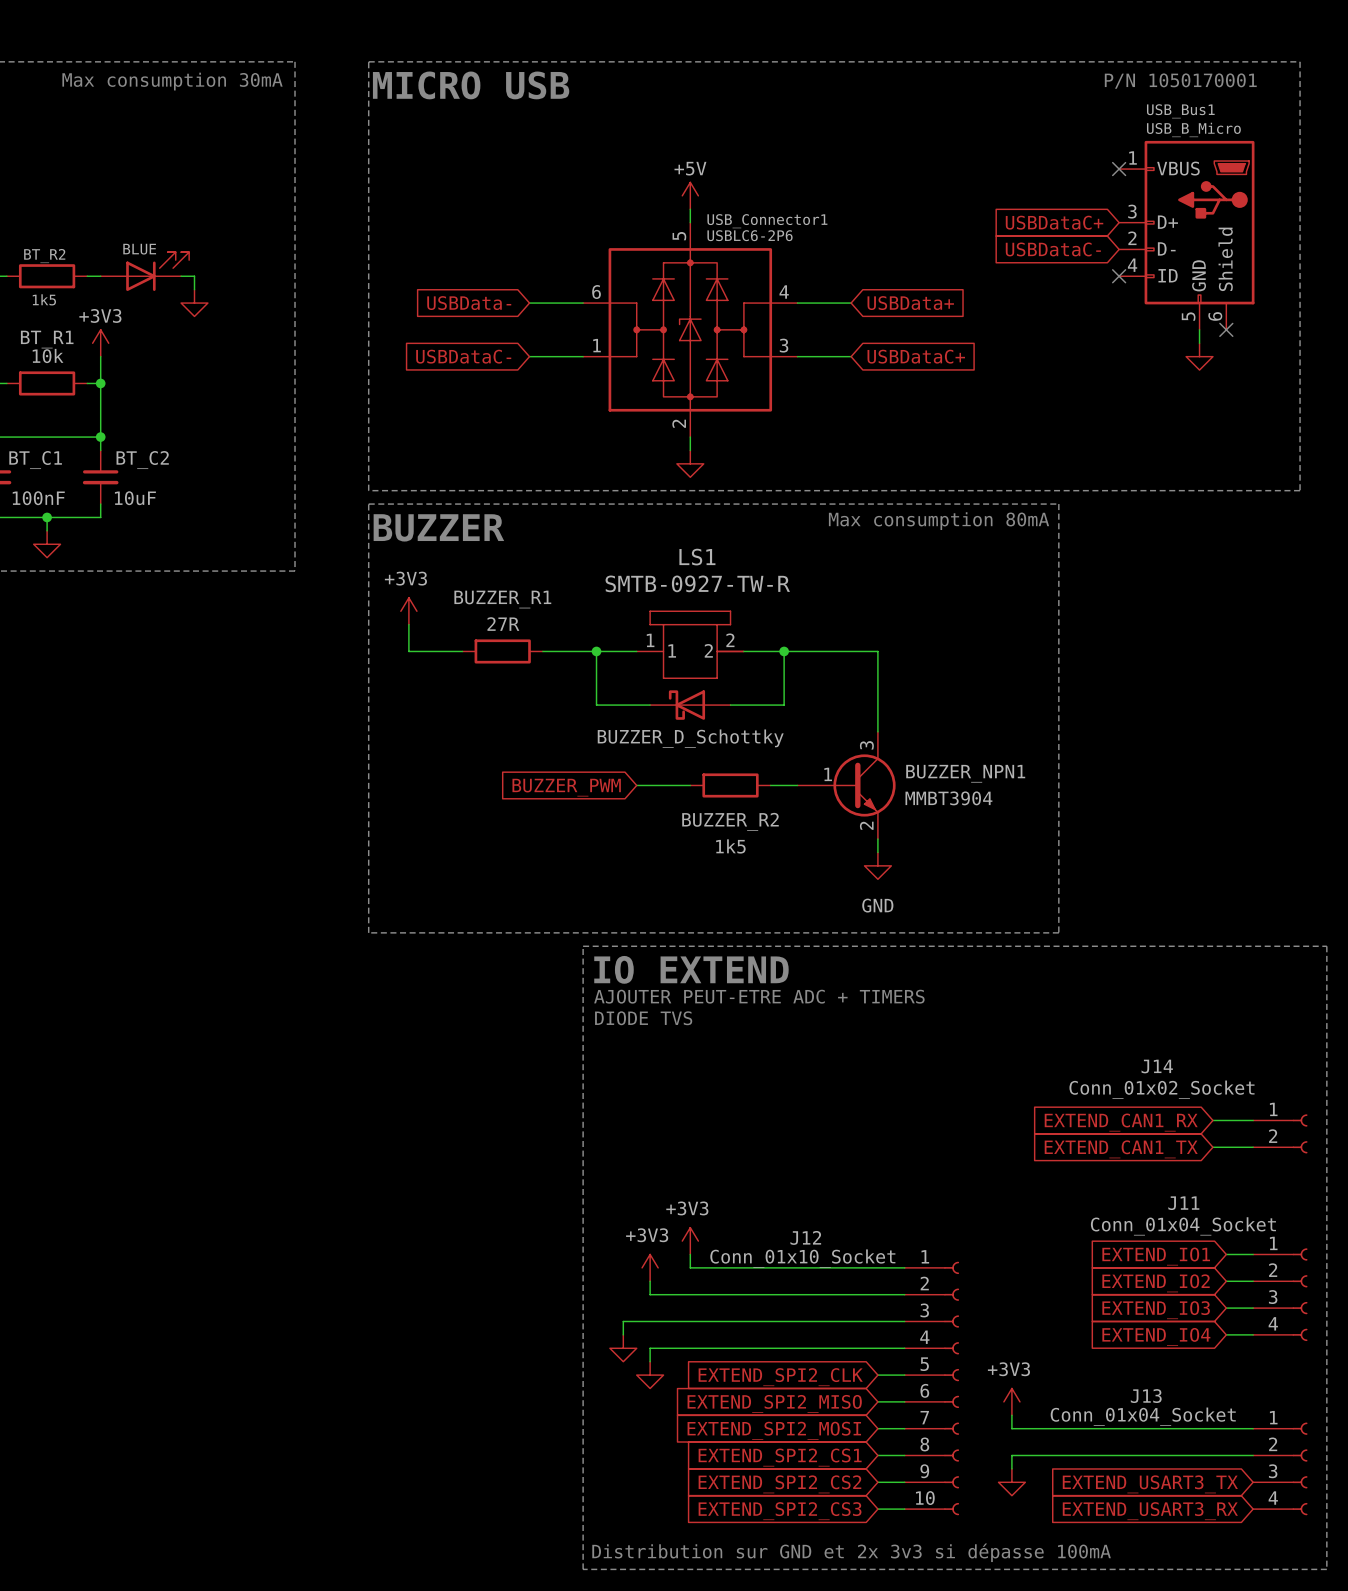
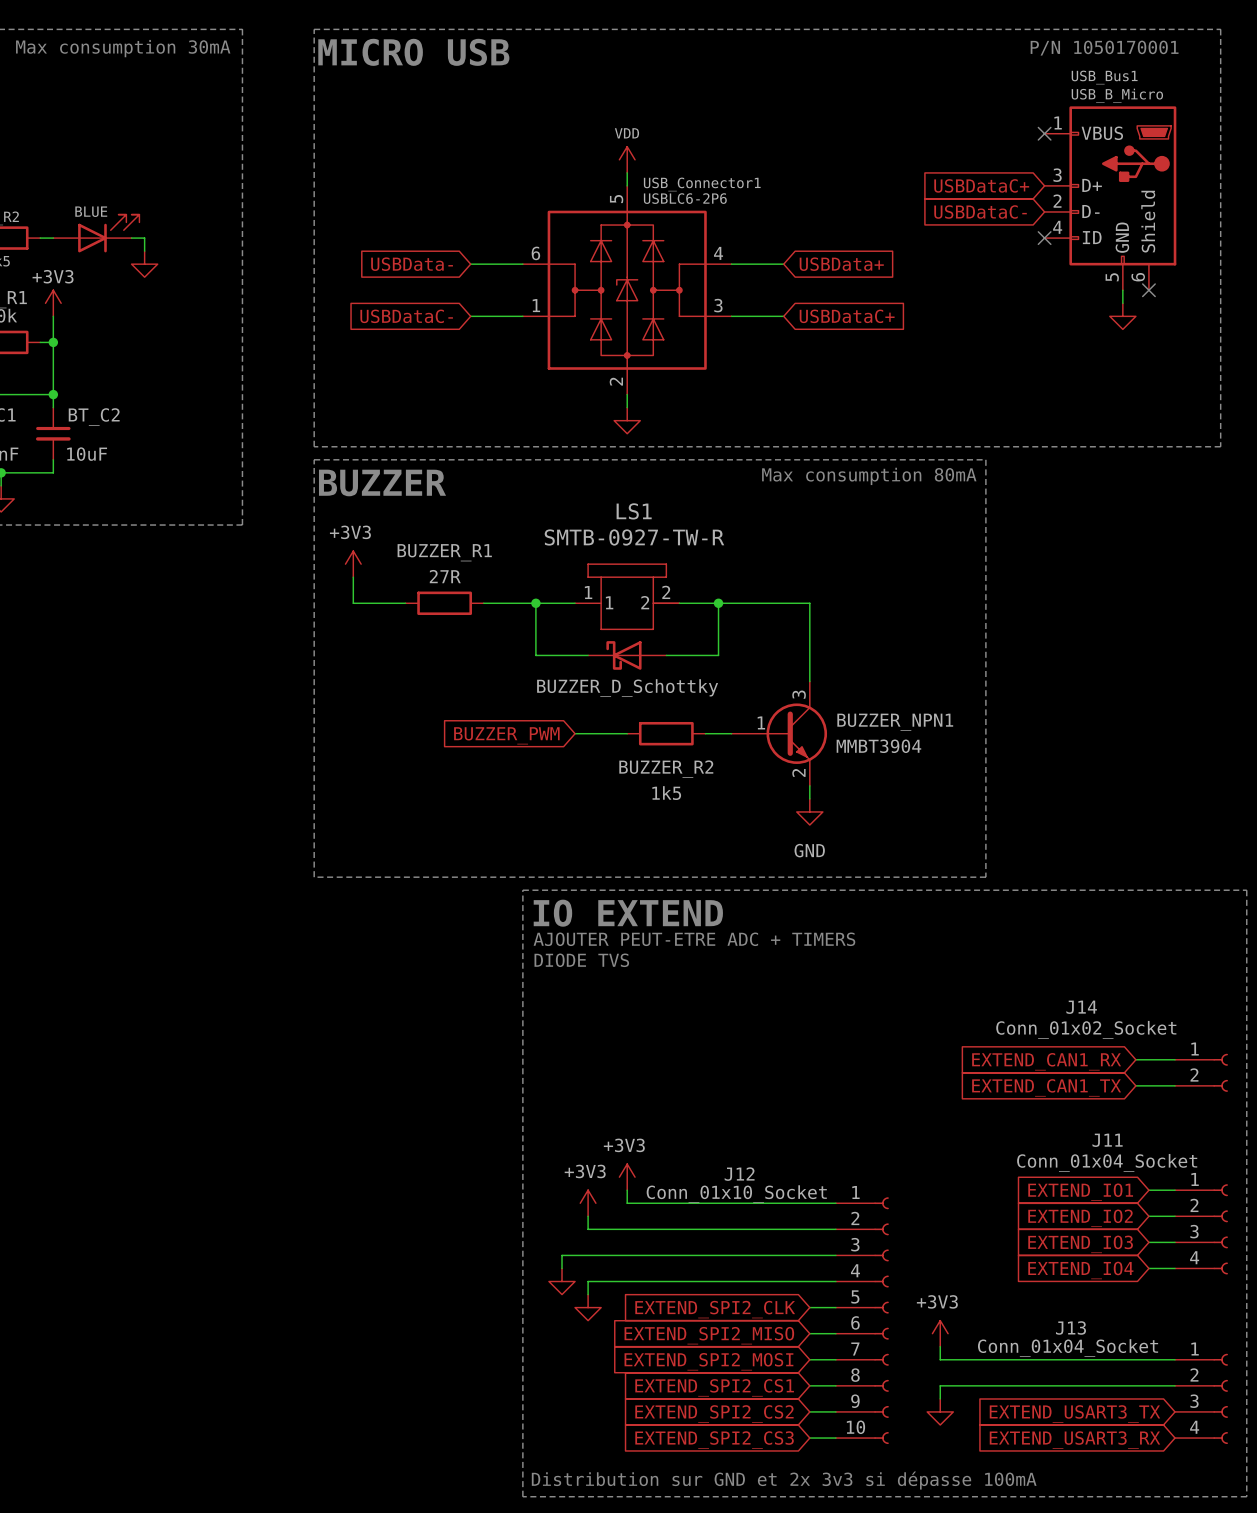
power symbol: +5V (690, 195) -> VDD (627, 159)

